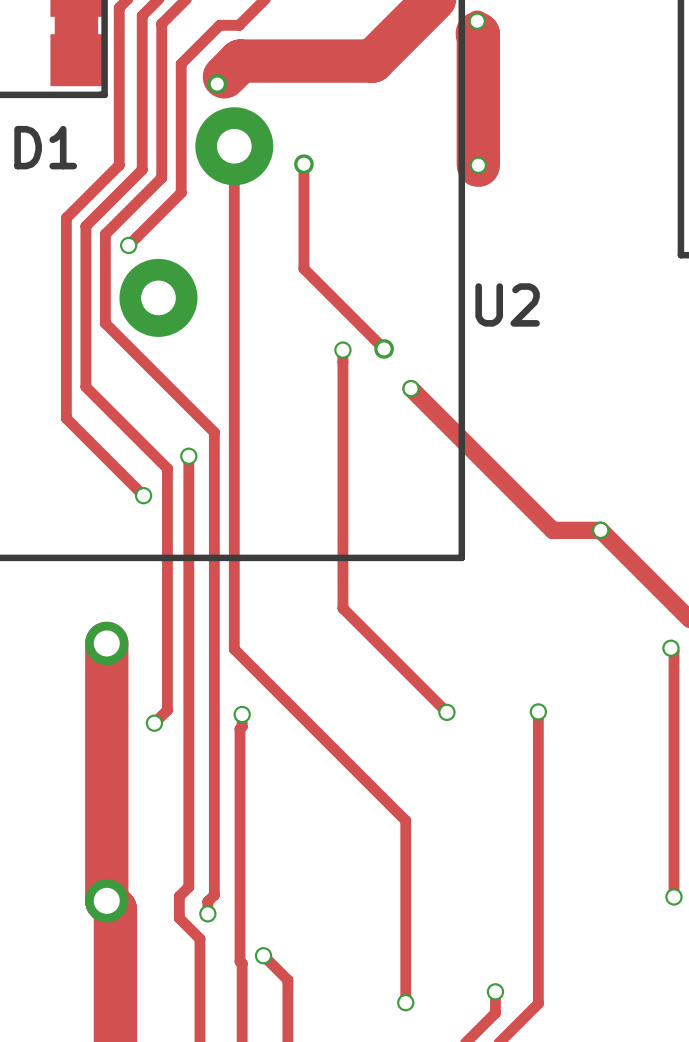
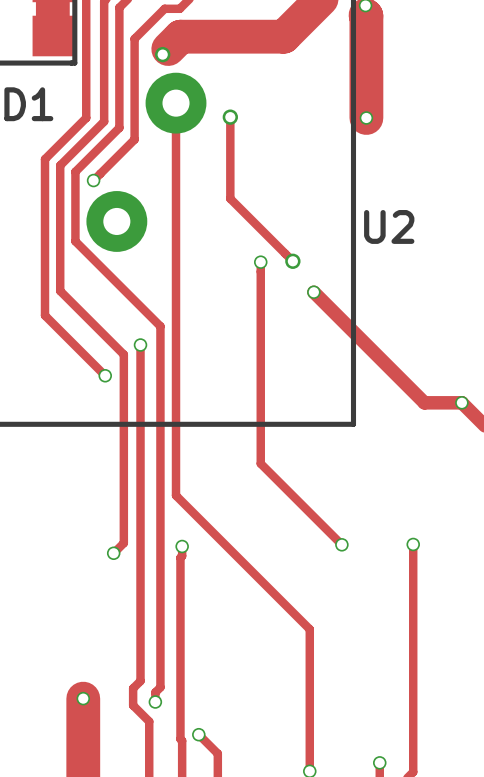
track: (106, 643) (106, 900) (115, 909) -> none
via: (106, 643) -> none
via size: [85, 879, 129, 923] -> [76, 691, 91, 706]

